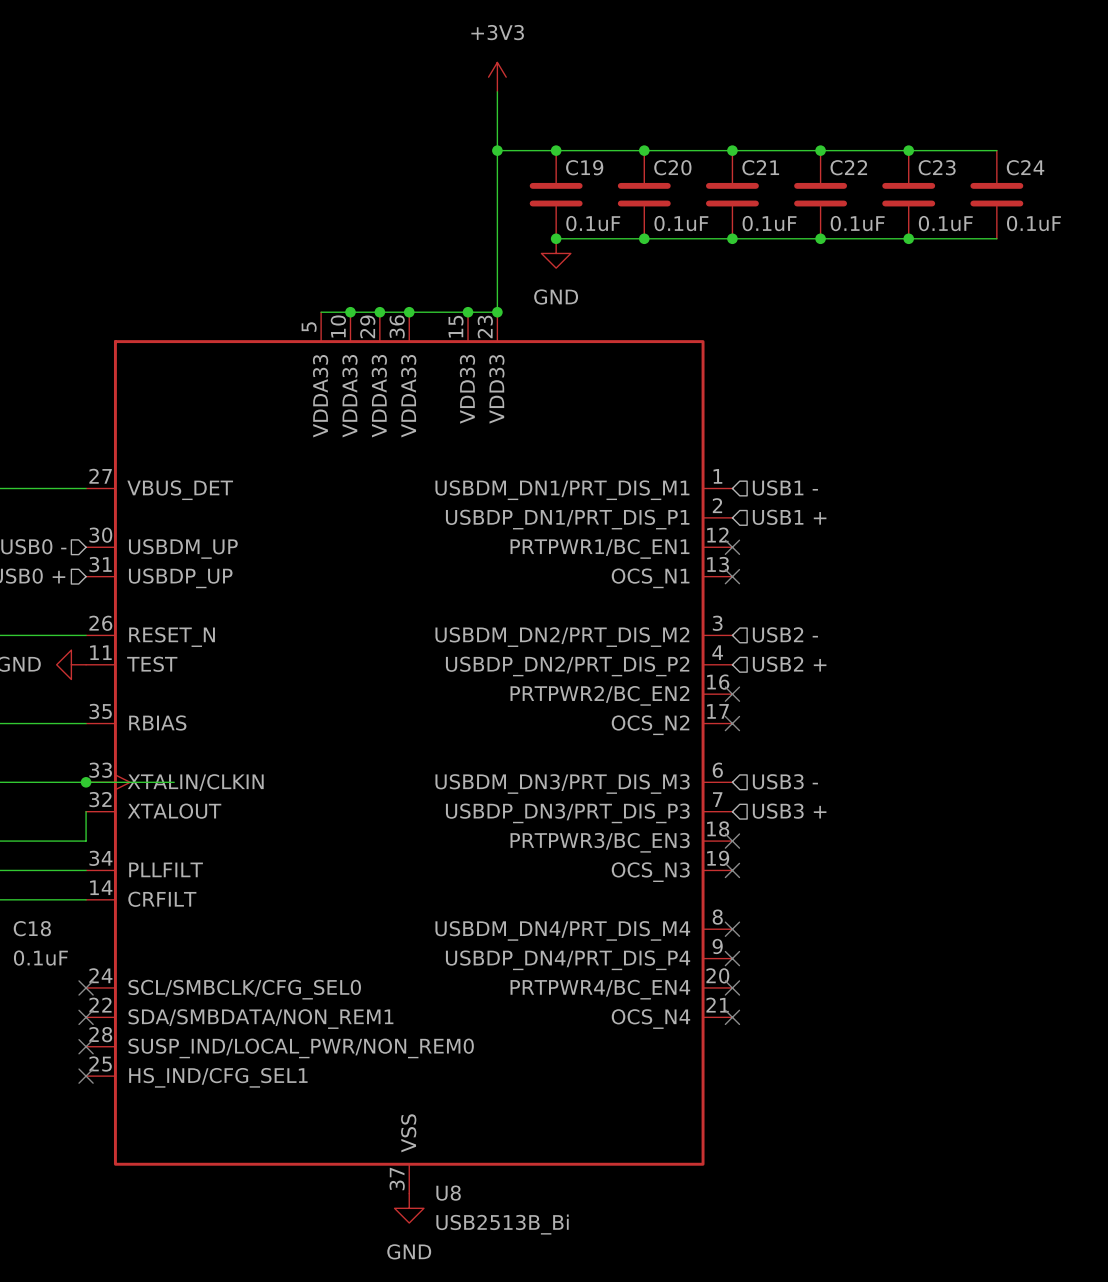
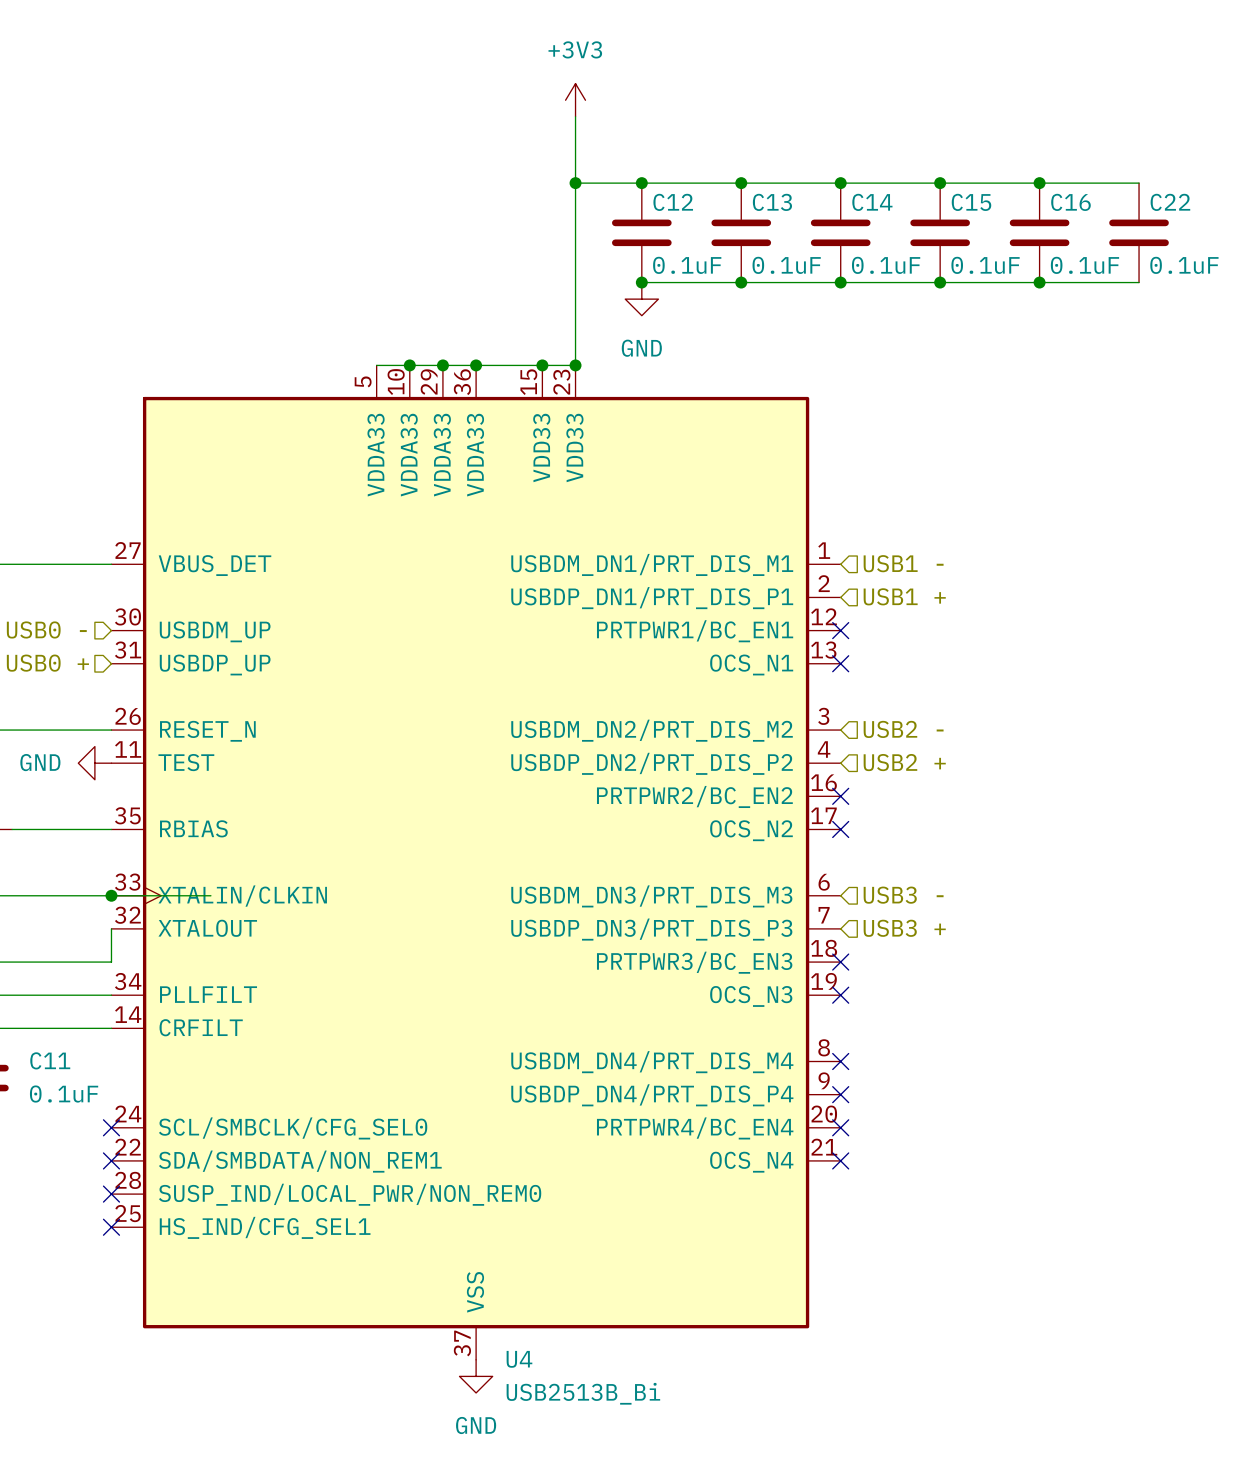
C19 name: C19 (584, 167) -> C12 (673, 202)
C20 name: C20 (672, 167) -> C13 (772, 202)
C21 name: C21 (760, 167) -> C14 (872, 202)
C22 name: C22 (848, 167) -> C15 (971, 202)
C23 name: C23 (937, 167) -> C16 (1070, 202)
C24 name: C24 (1025, 167) -> C22 (1170, 202)
C18 name: C18 (32, 928) -> C11 (50, 1060)
U8 name: U8 (448, 1193) -> U4 (519, 1359)

